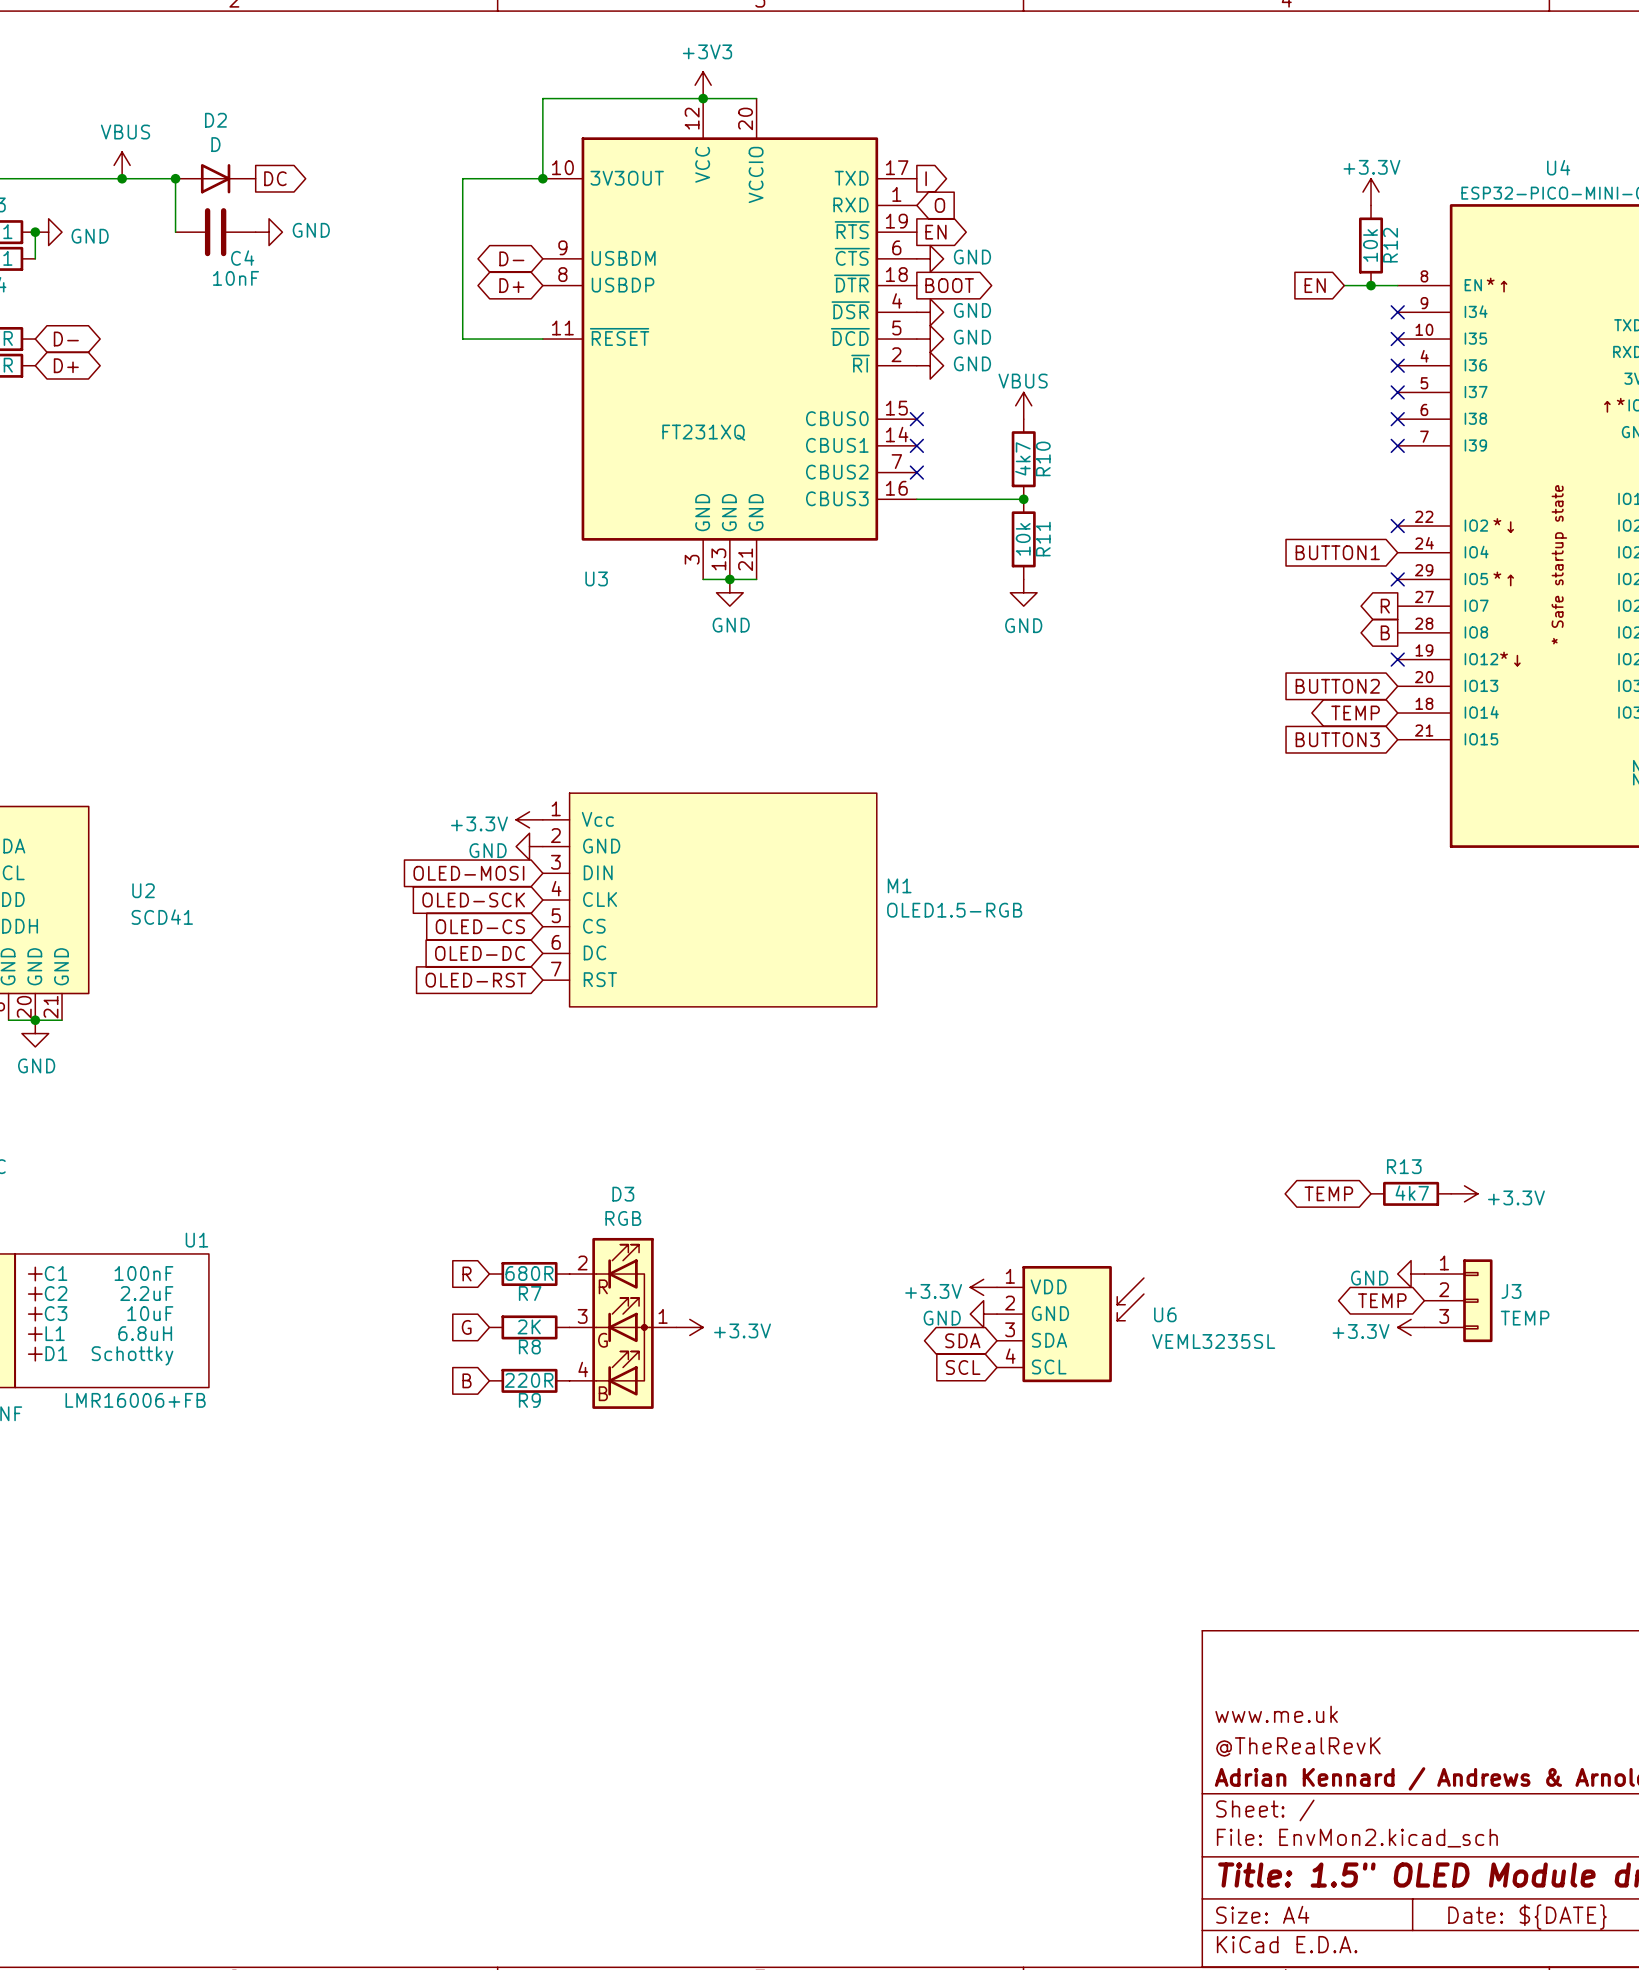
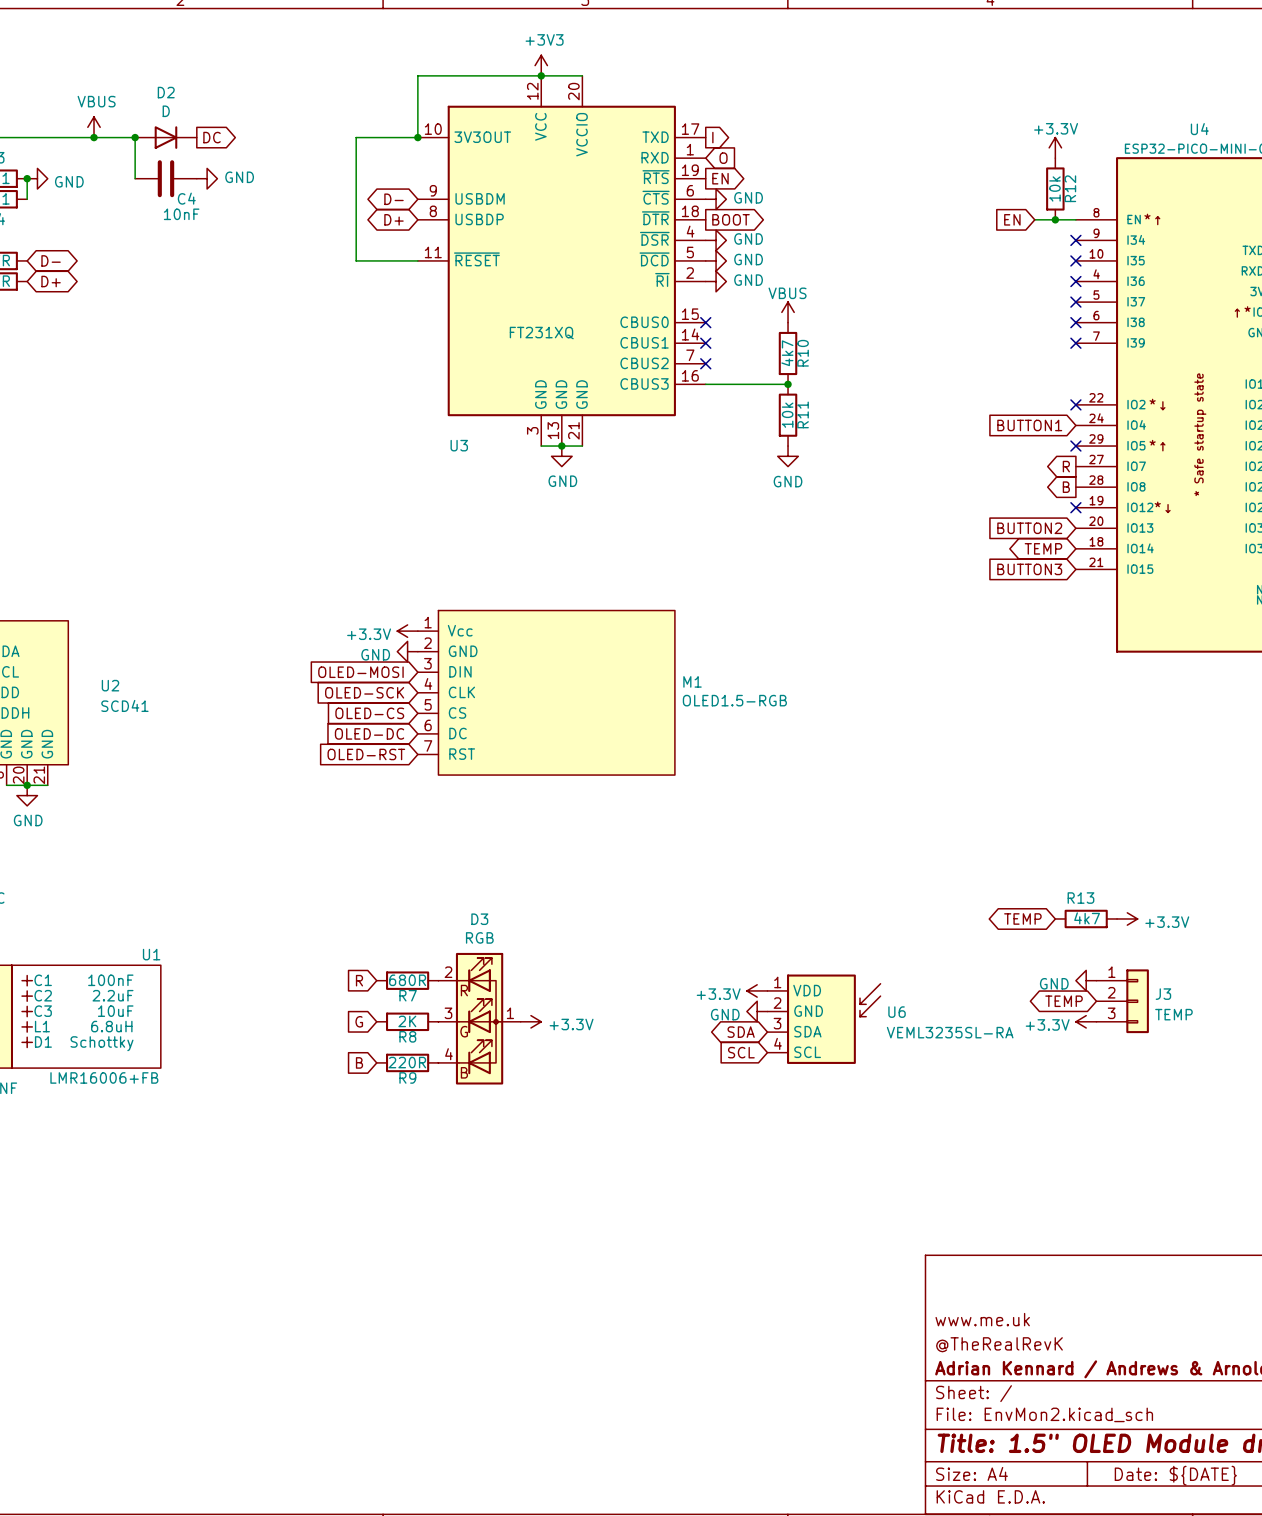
U6 value: VEML3235SL (1213, 1341) -> VEML3235SL-RA (950, 1032)

